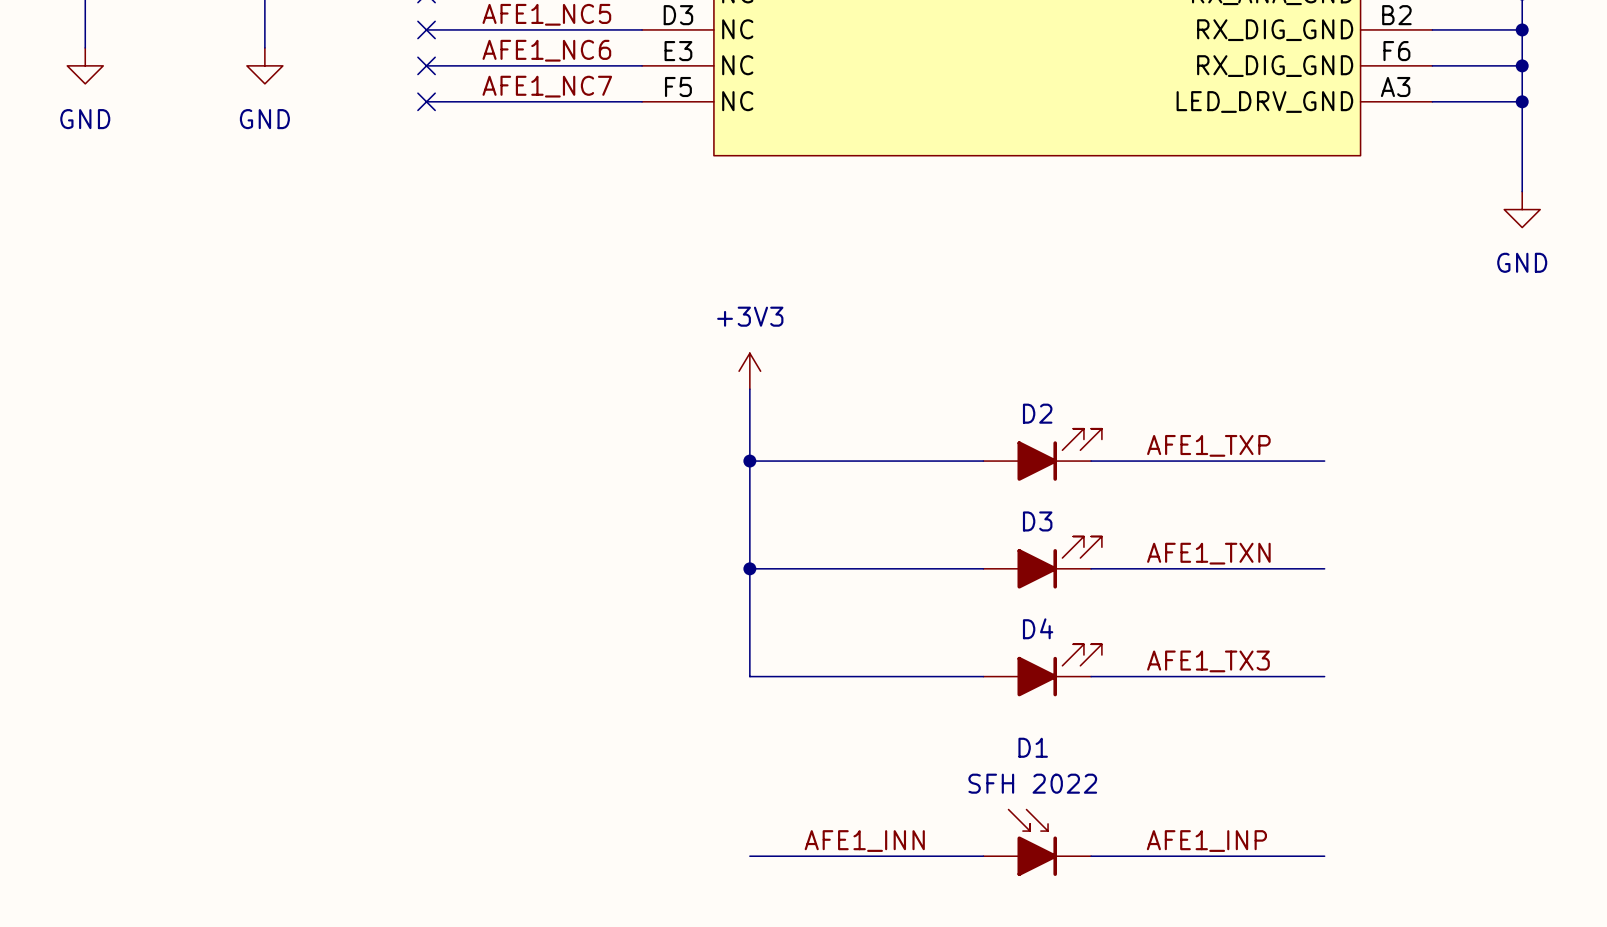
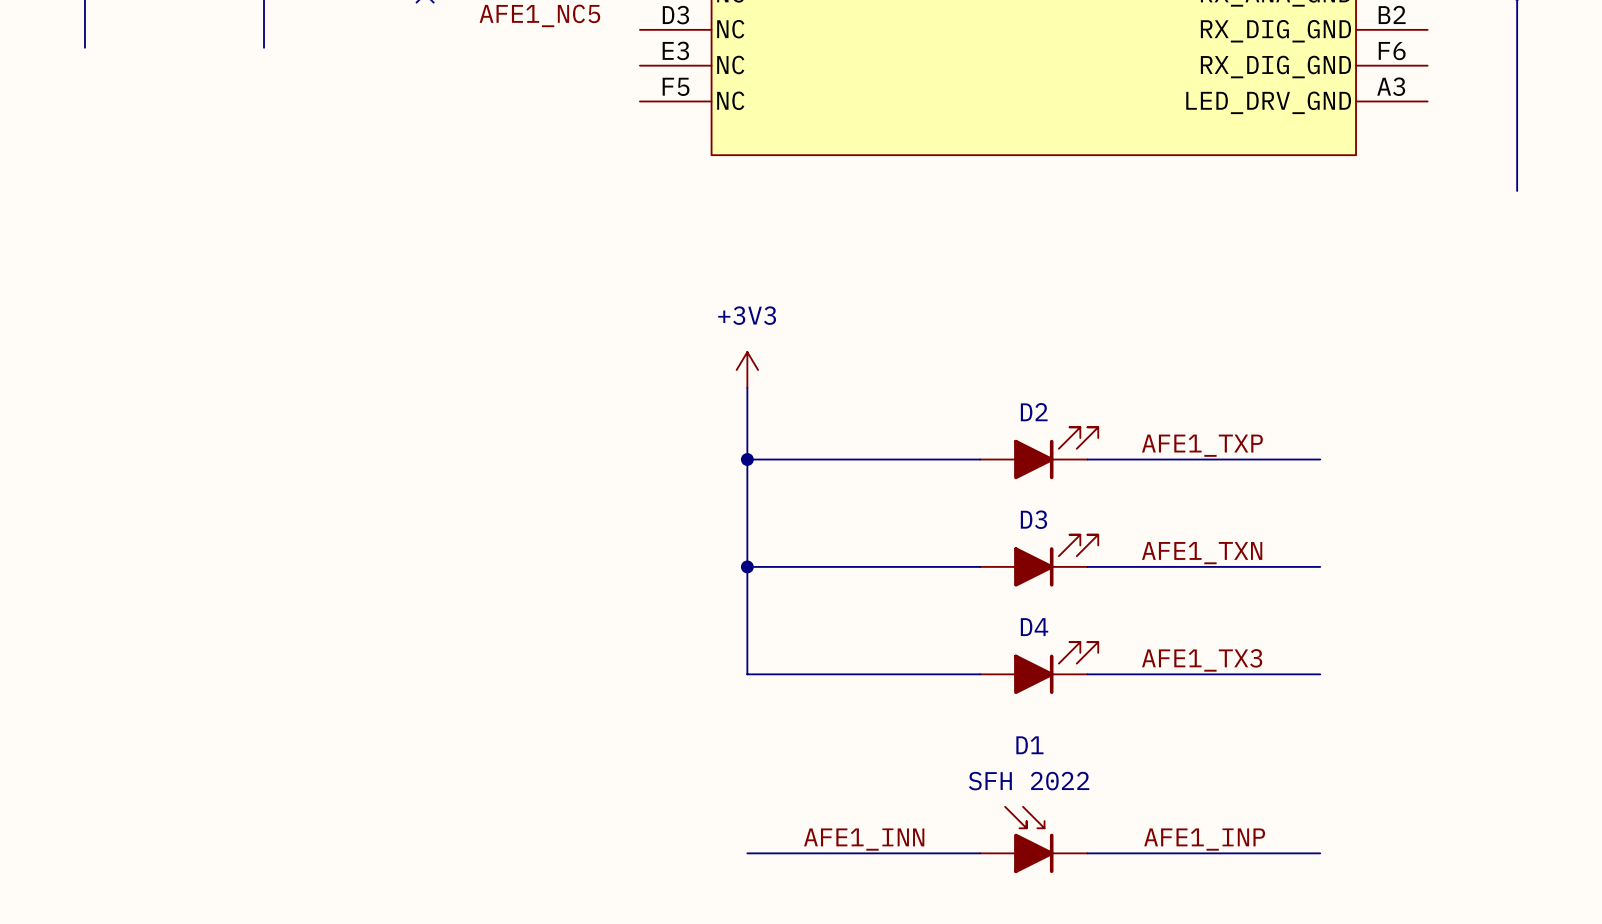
wire: (426, 29) (642, 29) -> none
no-connect mark: (426, 29) -> none
wire: (1432, 29) (1522, 29) -> none
junction: (1522, 29) -> none
label: AFE1_NC6 (546, 50) -> none
power symbol: GND (85, 65) -> none
power symbol: GND (264, 65) -> none
wire: (426, 65) (642, 65) -> none
no-connect mark: (426, 65) -> none
wire: (1432, 65) (1522, 65) -> none
junction: (1522, 65) -> none
label: AFE1_NC7 (547, 86) -> none
wire: (426, 101) (642, 101) -> none
no-connect mark: (426, 101) -> none
wire: (1432, 101) (1522, 101) -> none
junction: (1522, 101) -> none
power symbol: GND (1522, 209) -> none

